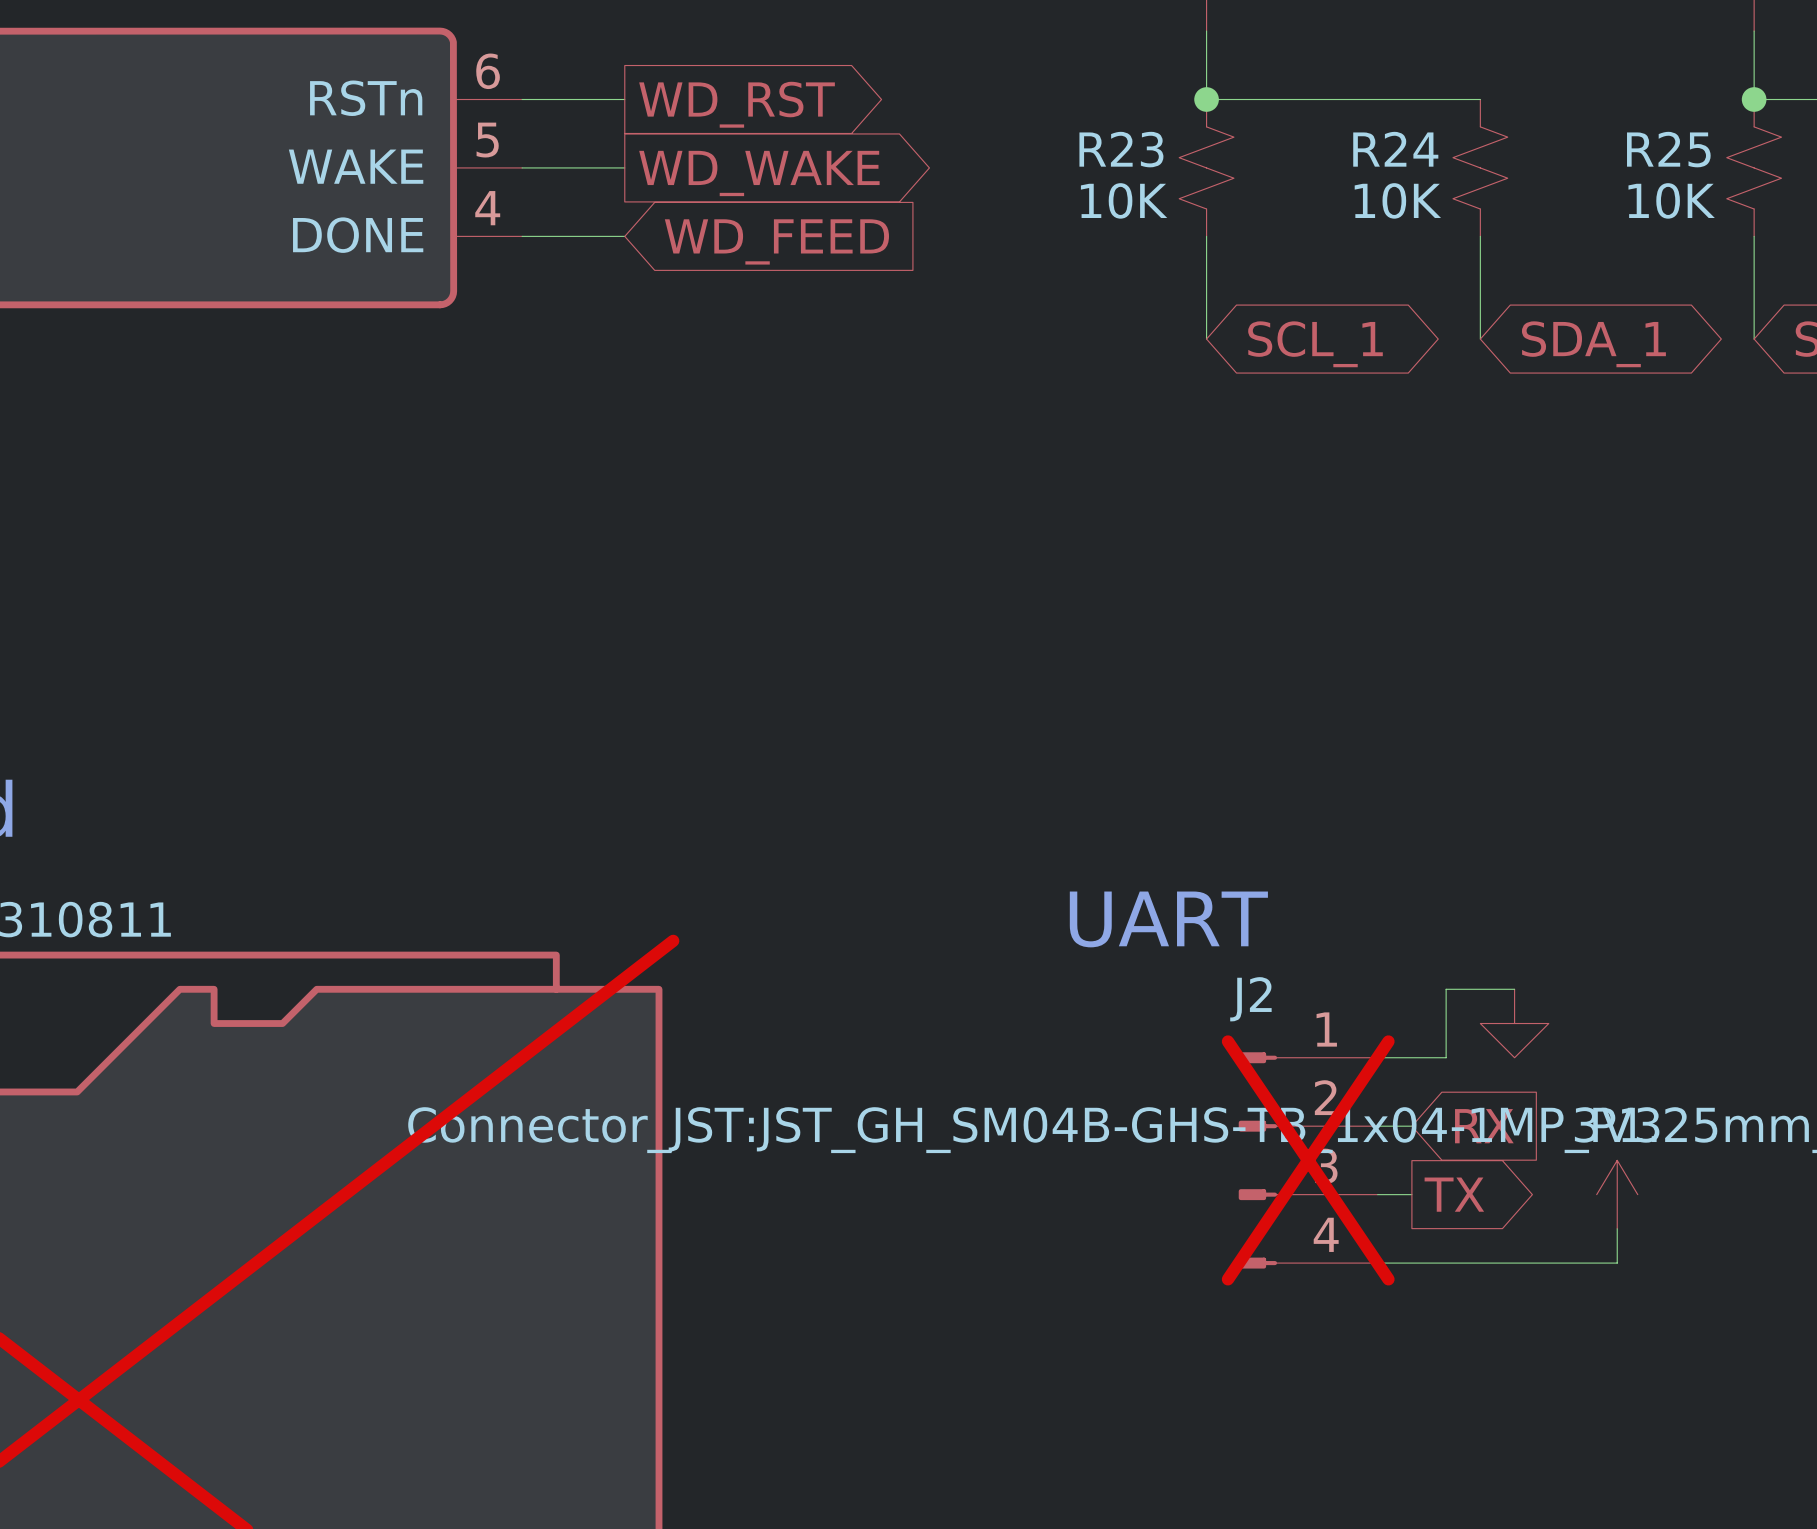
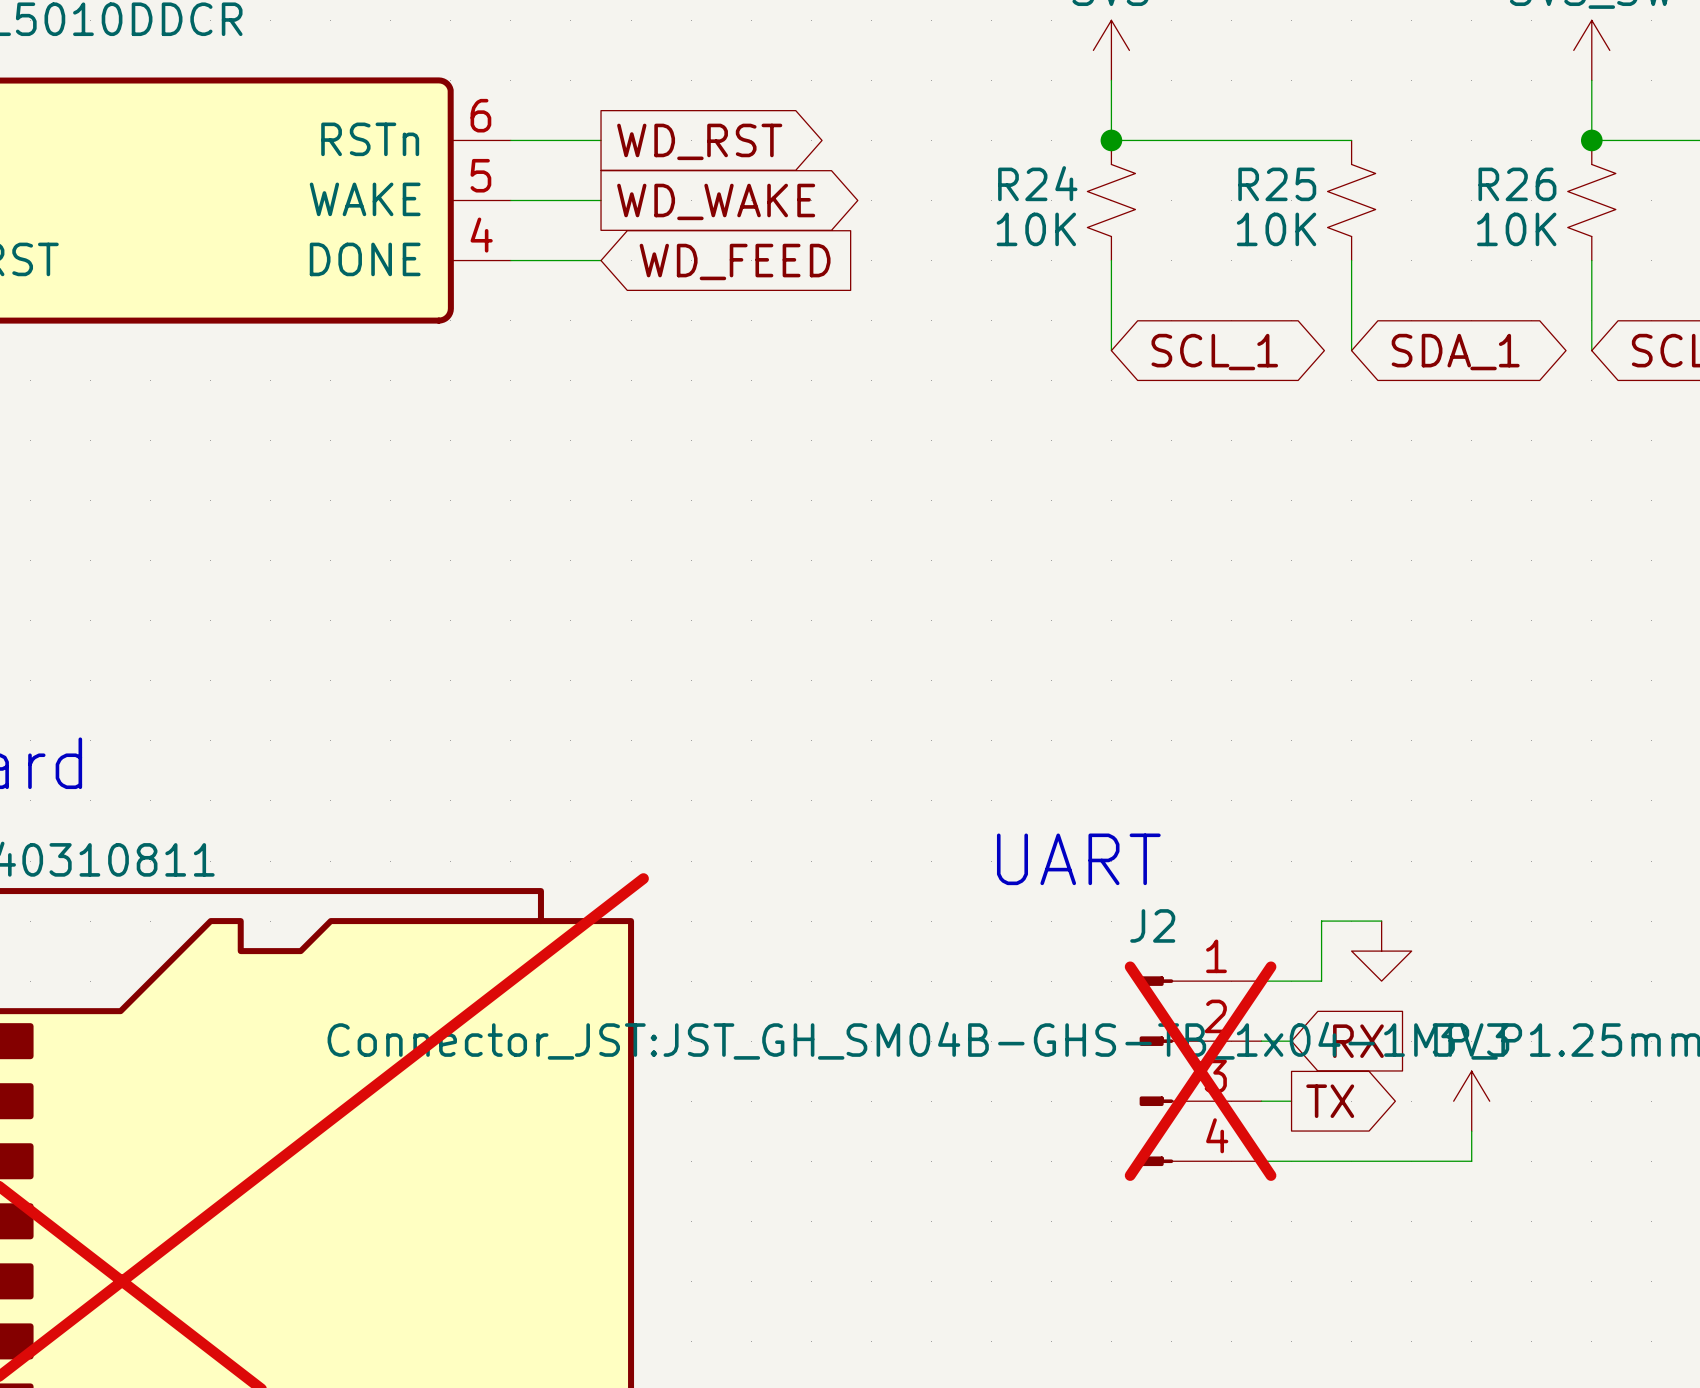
R23 name: R23 (1121, 149) -> R24 (1037, 183)
R24 name: R24 (1395, 149) -> R25 (1277, 184)
R25 name: R25 (1668, 149) -> R26 (1517, 184)

